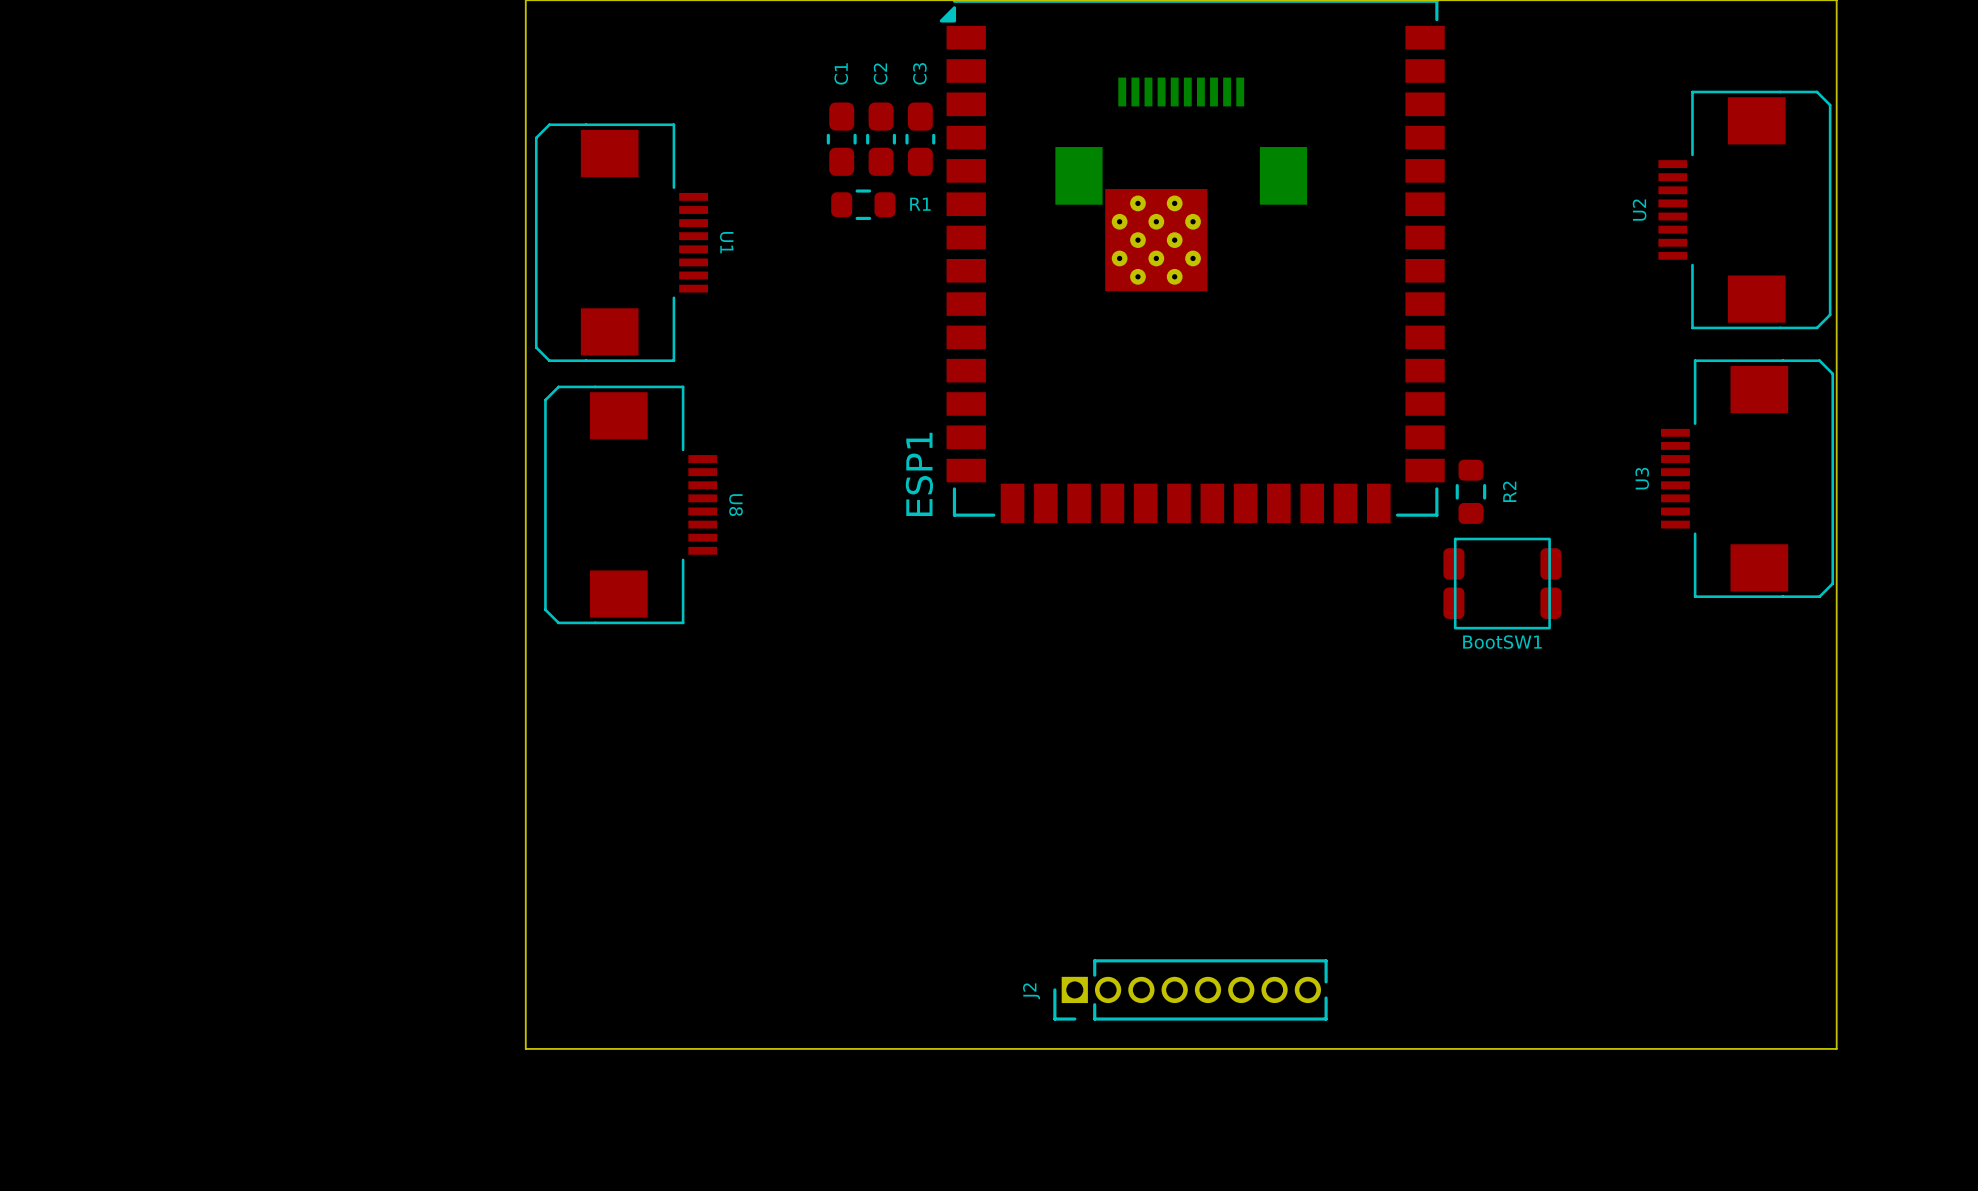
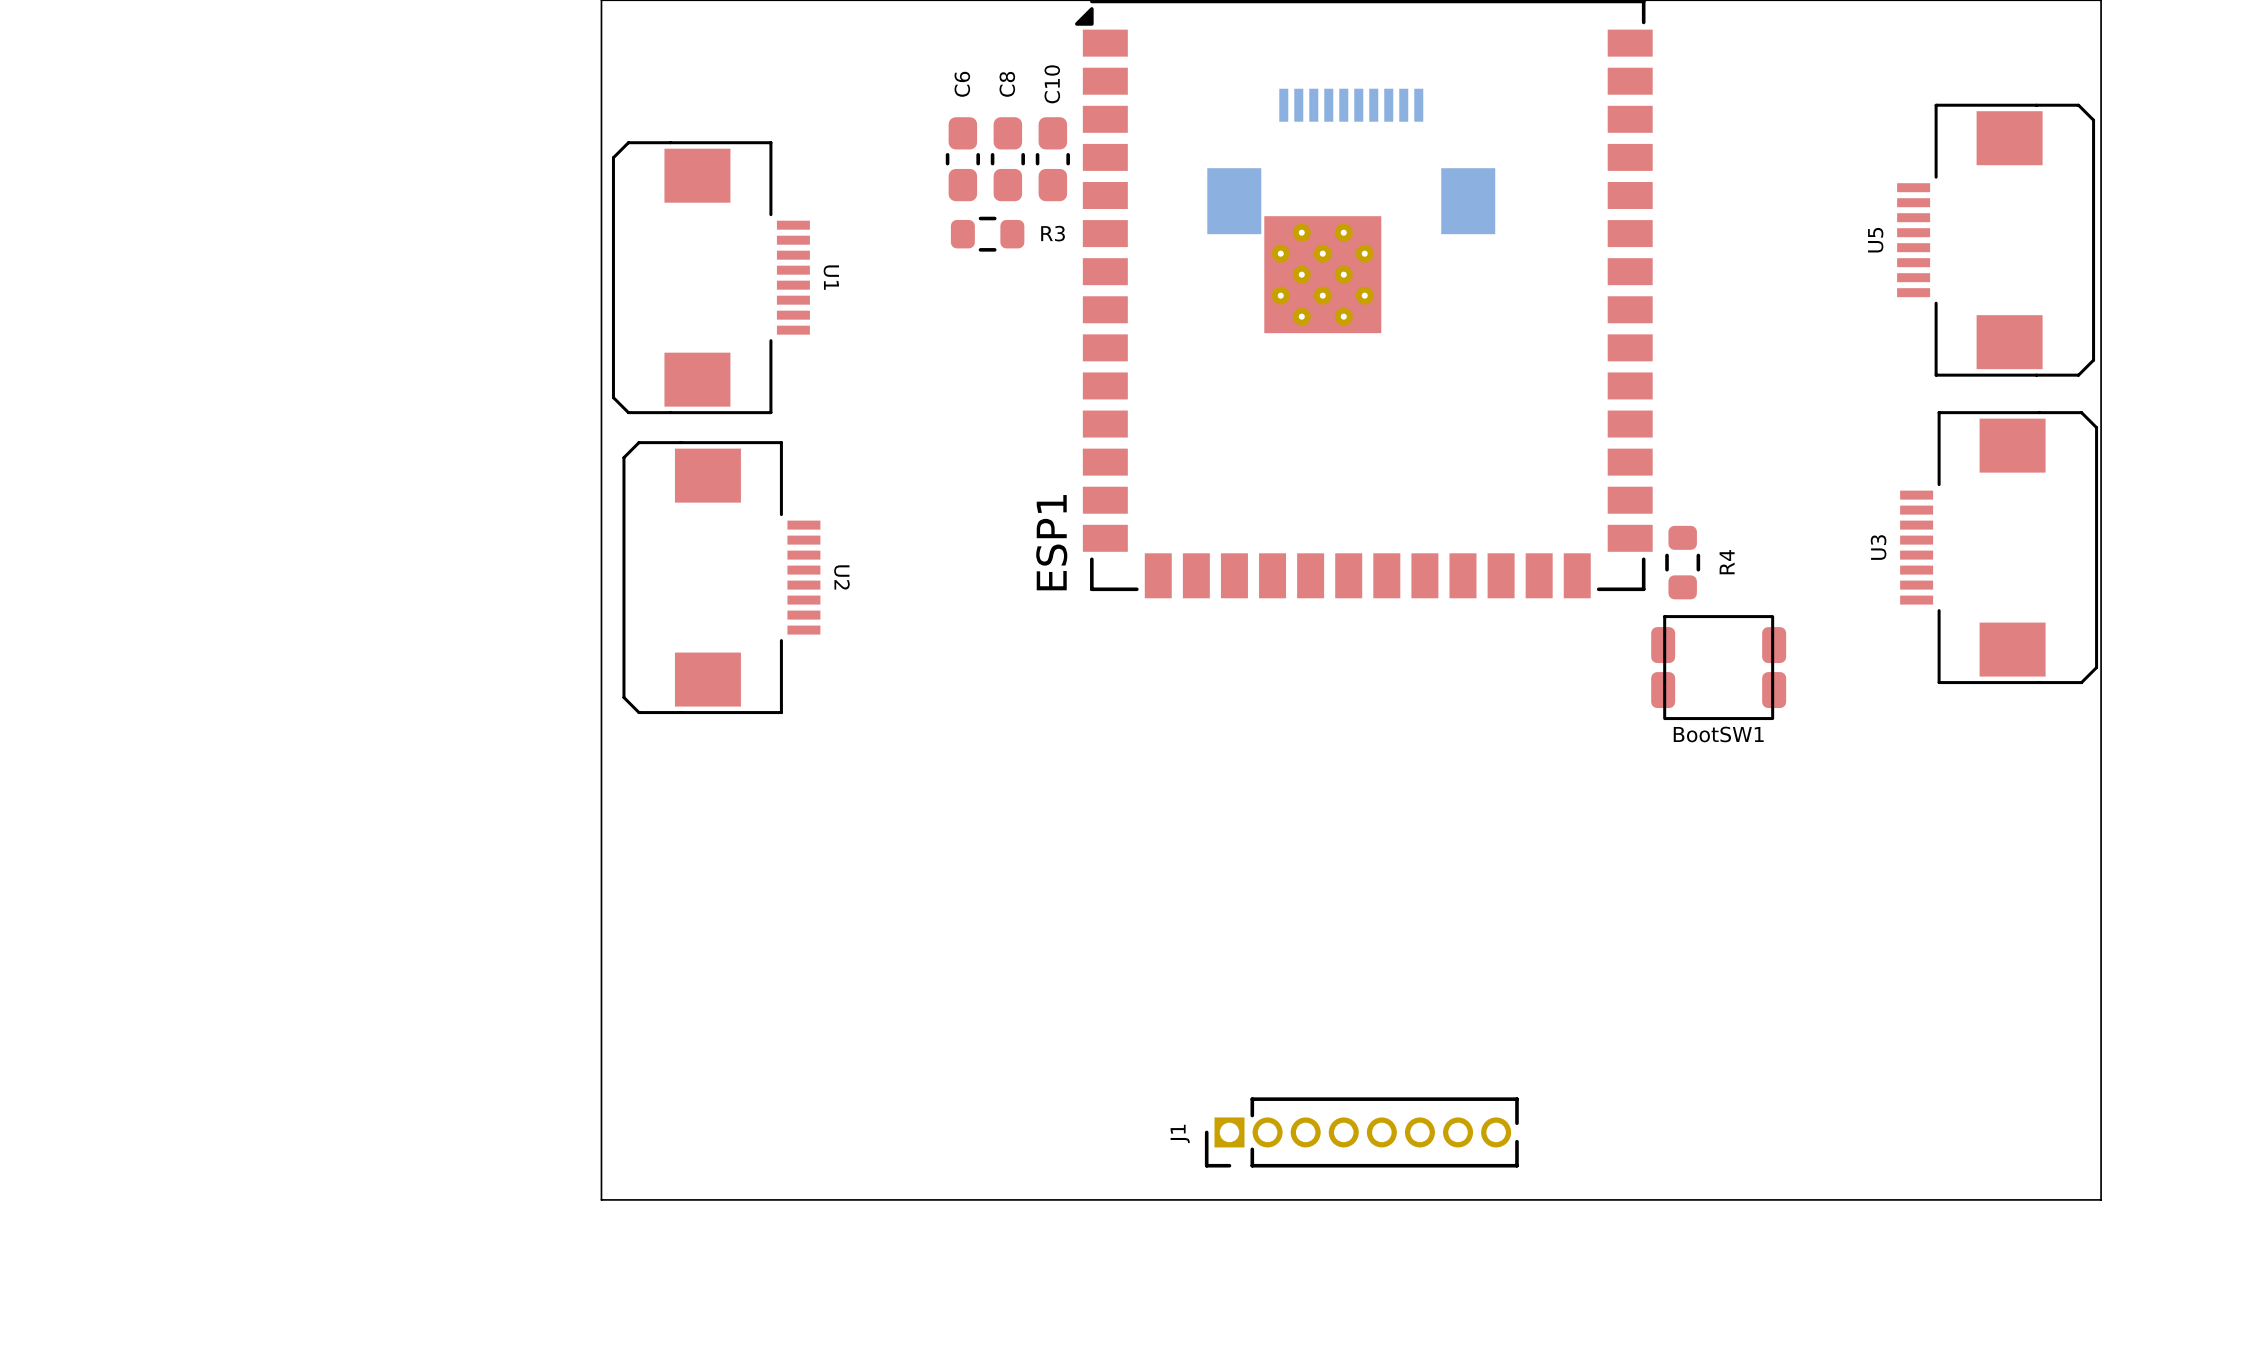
C1 name: C1 (841, 73) -> C6 (962, 84)
C3 name: C3 (919, 73) -> C10 (1052, 84)
C2 name: C2 (880, 74) -> C8 (1007, 84)
R1 name: R1 (920, 204) -> R3 (1053, 233)
U2 name: U2 (1639, 210) -> U5 (1875, 240)
R2 name: R2 (1509, 491) -> R4 (1727, 562)
U8 name: U8 (736, 505) -> U2 (841, 577)
J2 name: J2 (1031, 991) -> J1 (1180, 1133)

